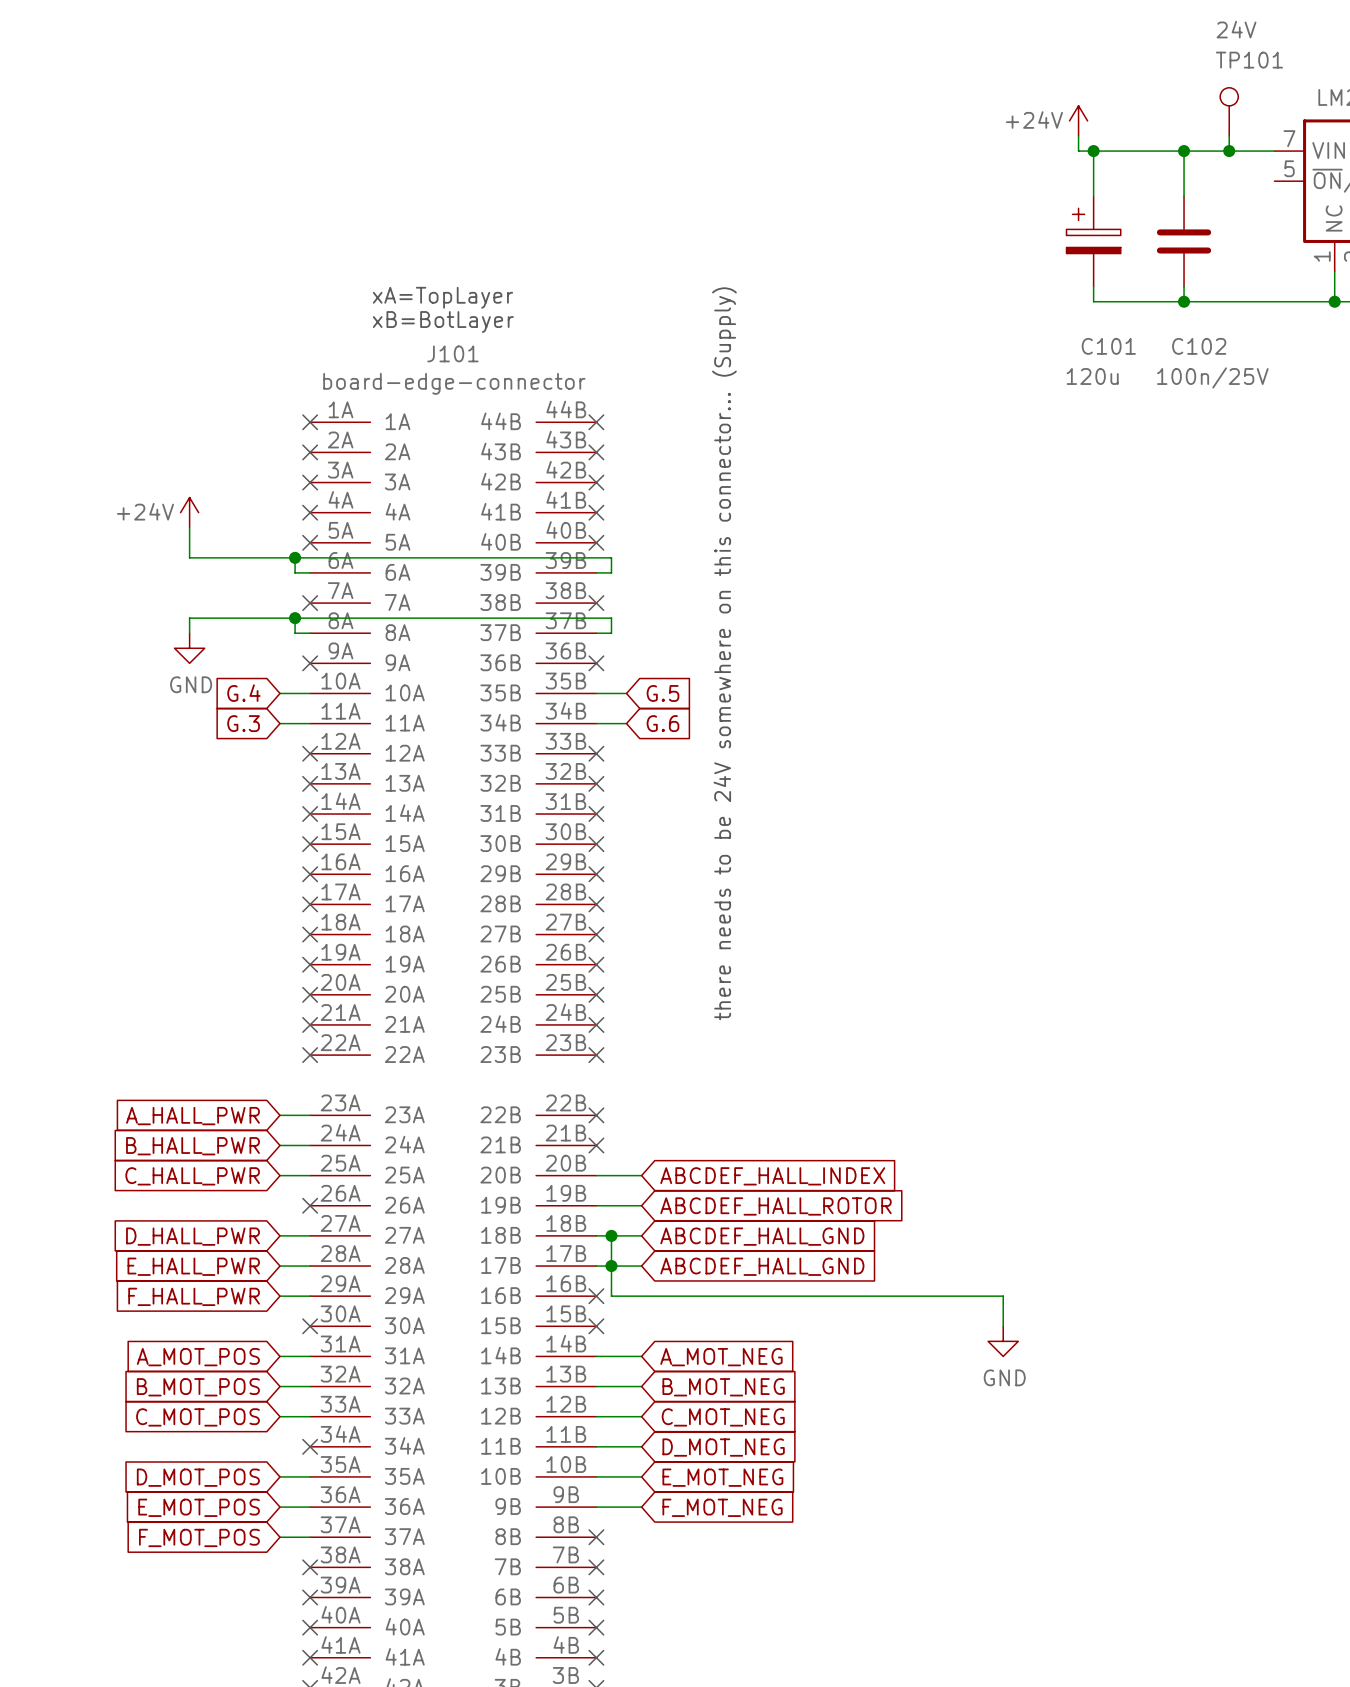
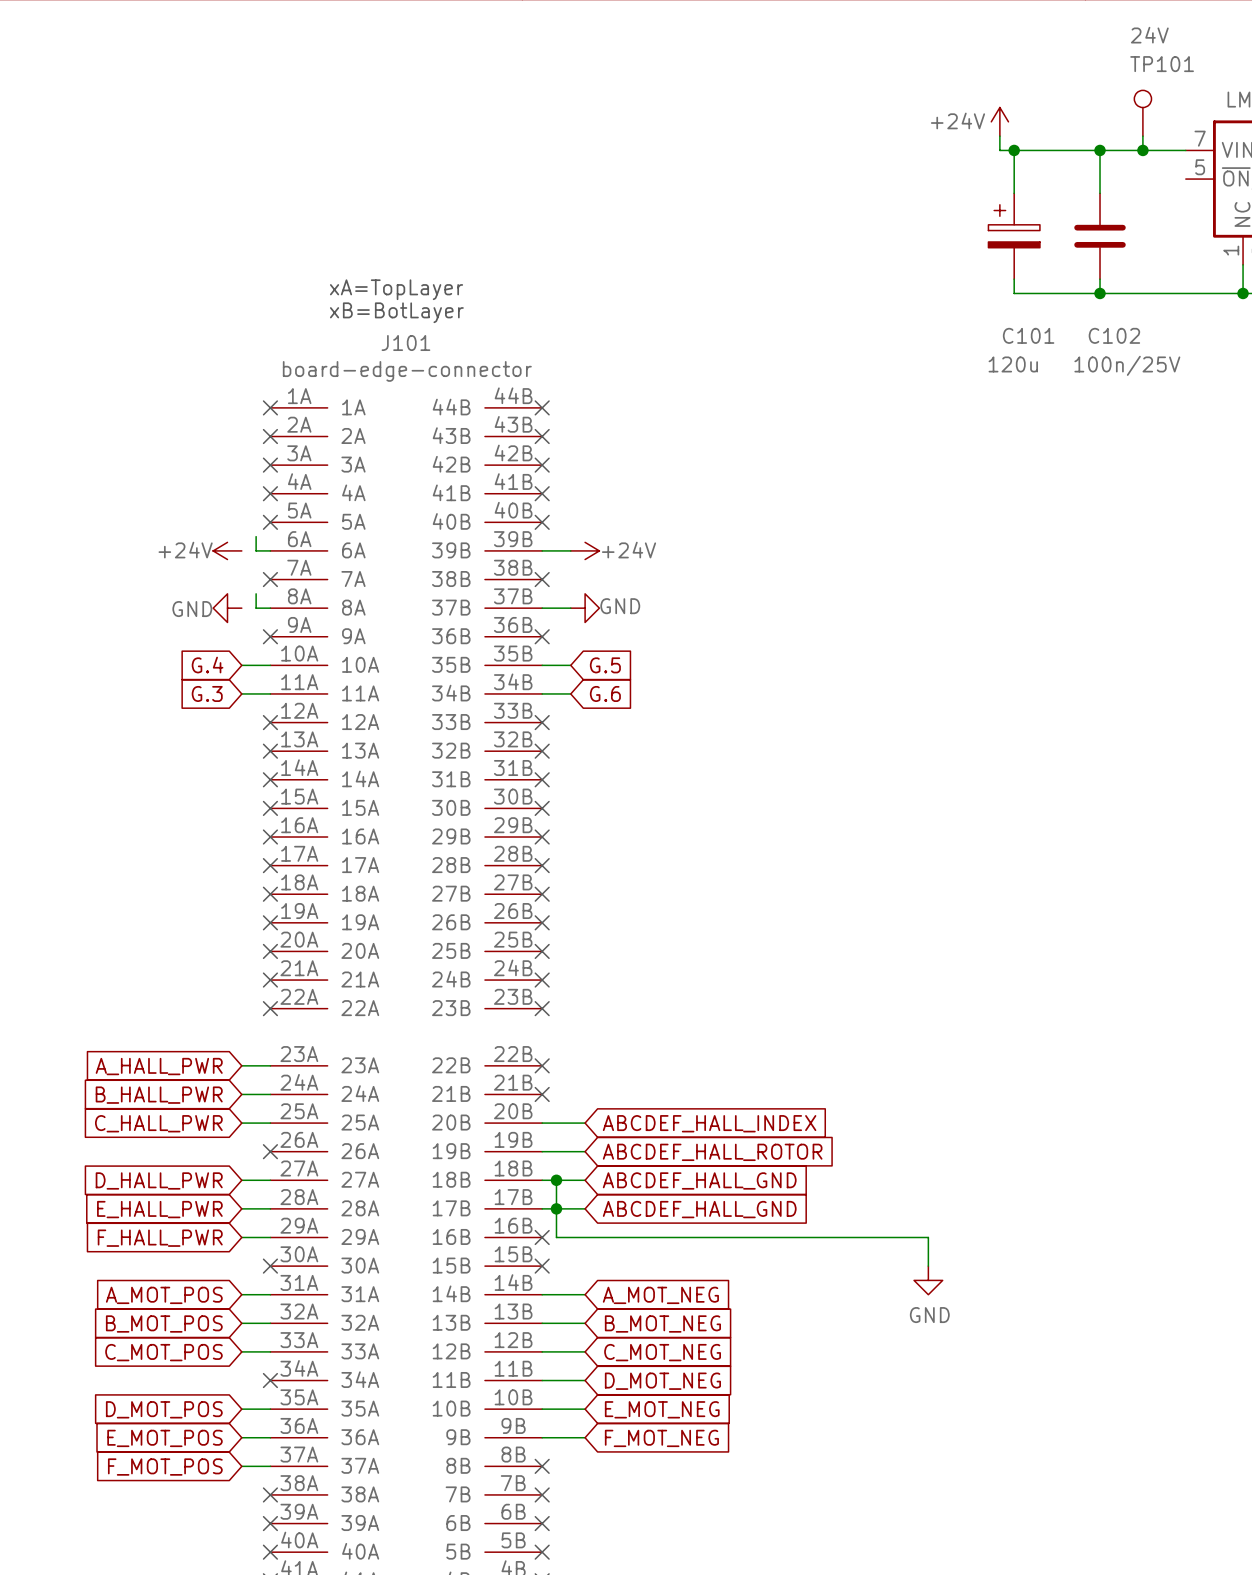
power symbol rotation: 0° (189, 512) -> 90° counterclockwise (227, 550)
power symbol position: +24V (189, 512) -> +24V (227, 550)
wire: (189, 527) (189, 557) (611, 557) (611, 572) -> (570, 550) (556, 550)
junction: (295, 557) -> none
power symbol: none -> +24V (585, 550)
junction: (295, 618) -> none
wire: (189, 633) (189, 618) (611, 618) (611, 633) -> (570, 608) (556, 608)
power symbol: none -> GND (585, 608)
power symbol rotation: 0° (189, 648) -> 90° clockwise (227, 608)
power symbol position: GND (189, 648) -> GND (227, 608)
text: there needs to be 24V somewhere on this connector... (Supply) (724, 653) -> none

